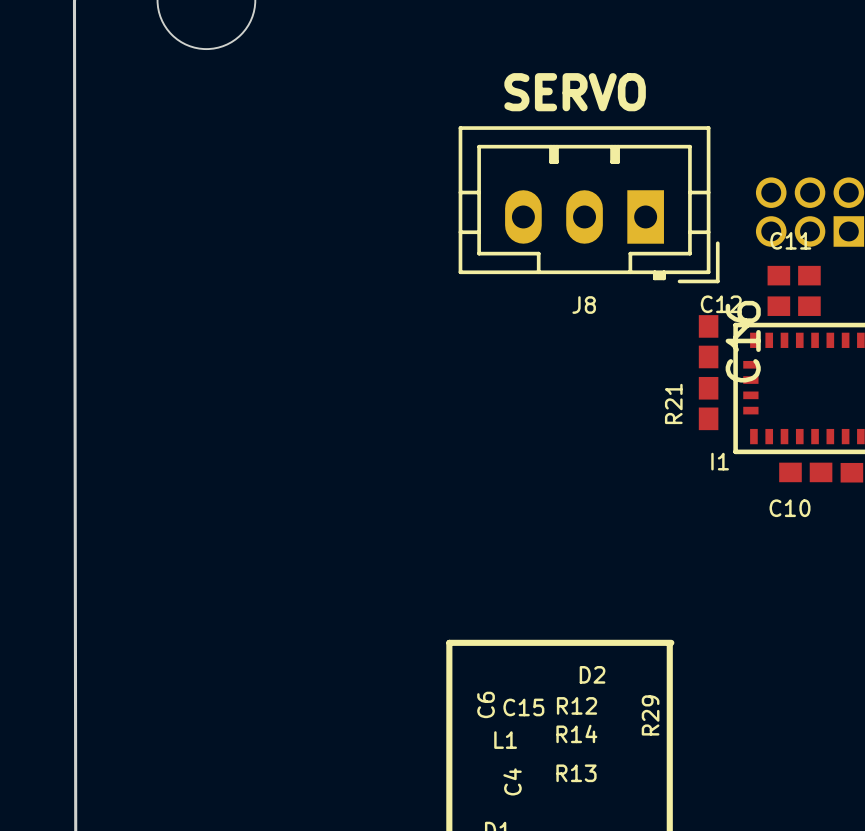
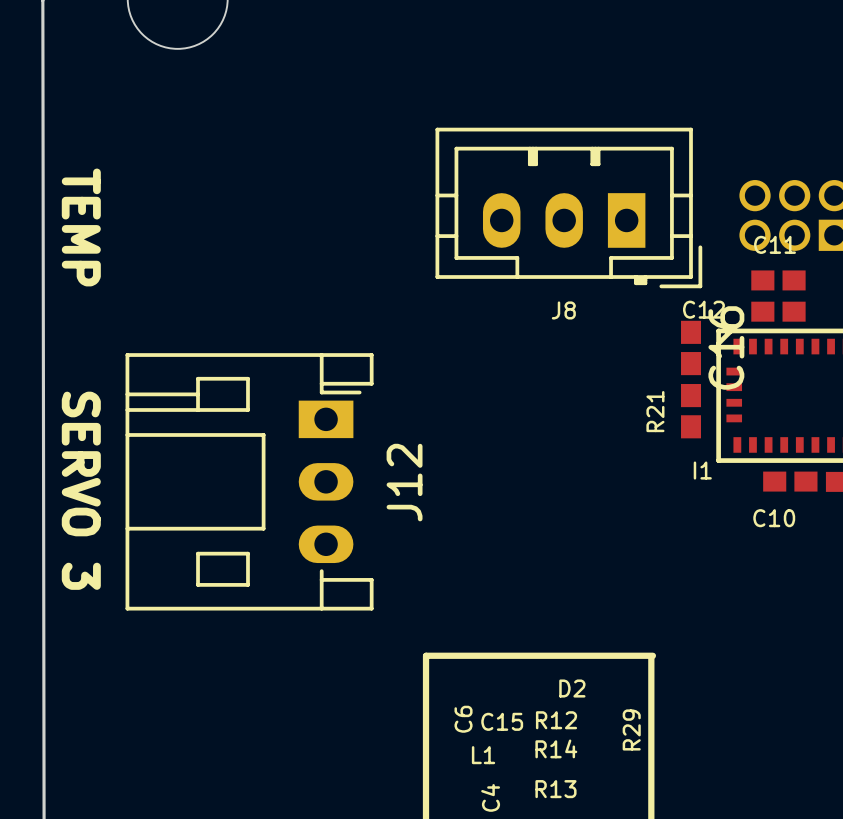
text: SERVO (575, 92) -> none
text: none -> TEMP (81, 227)
J12: none -> (249, 481)
text: none -> SERVO 3 (81, 490)

